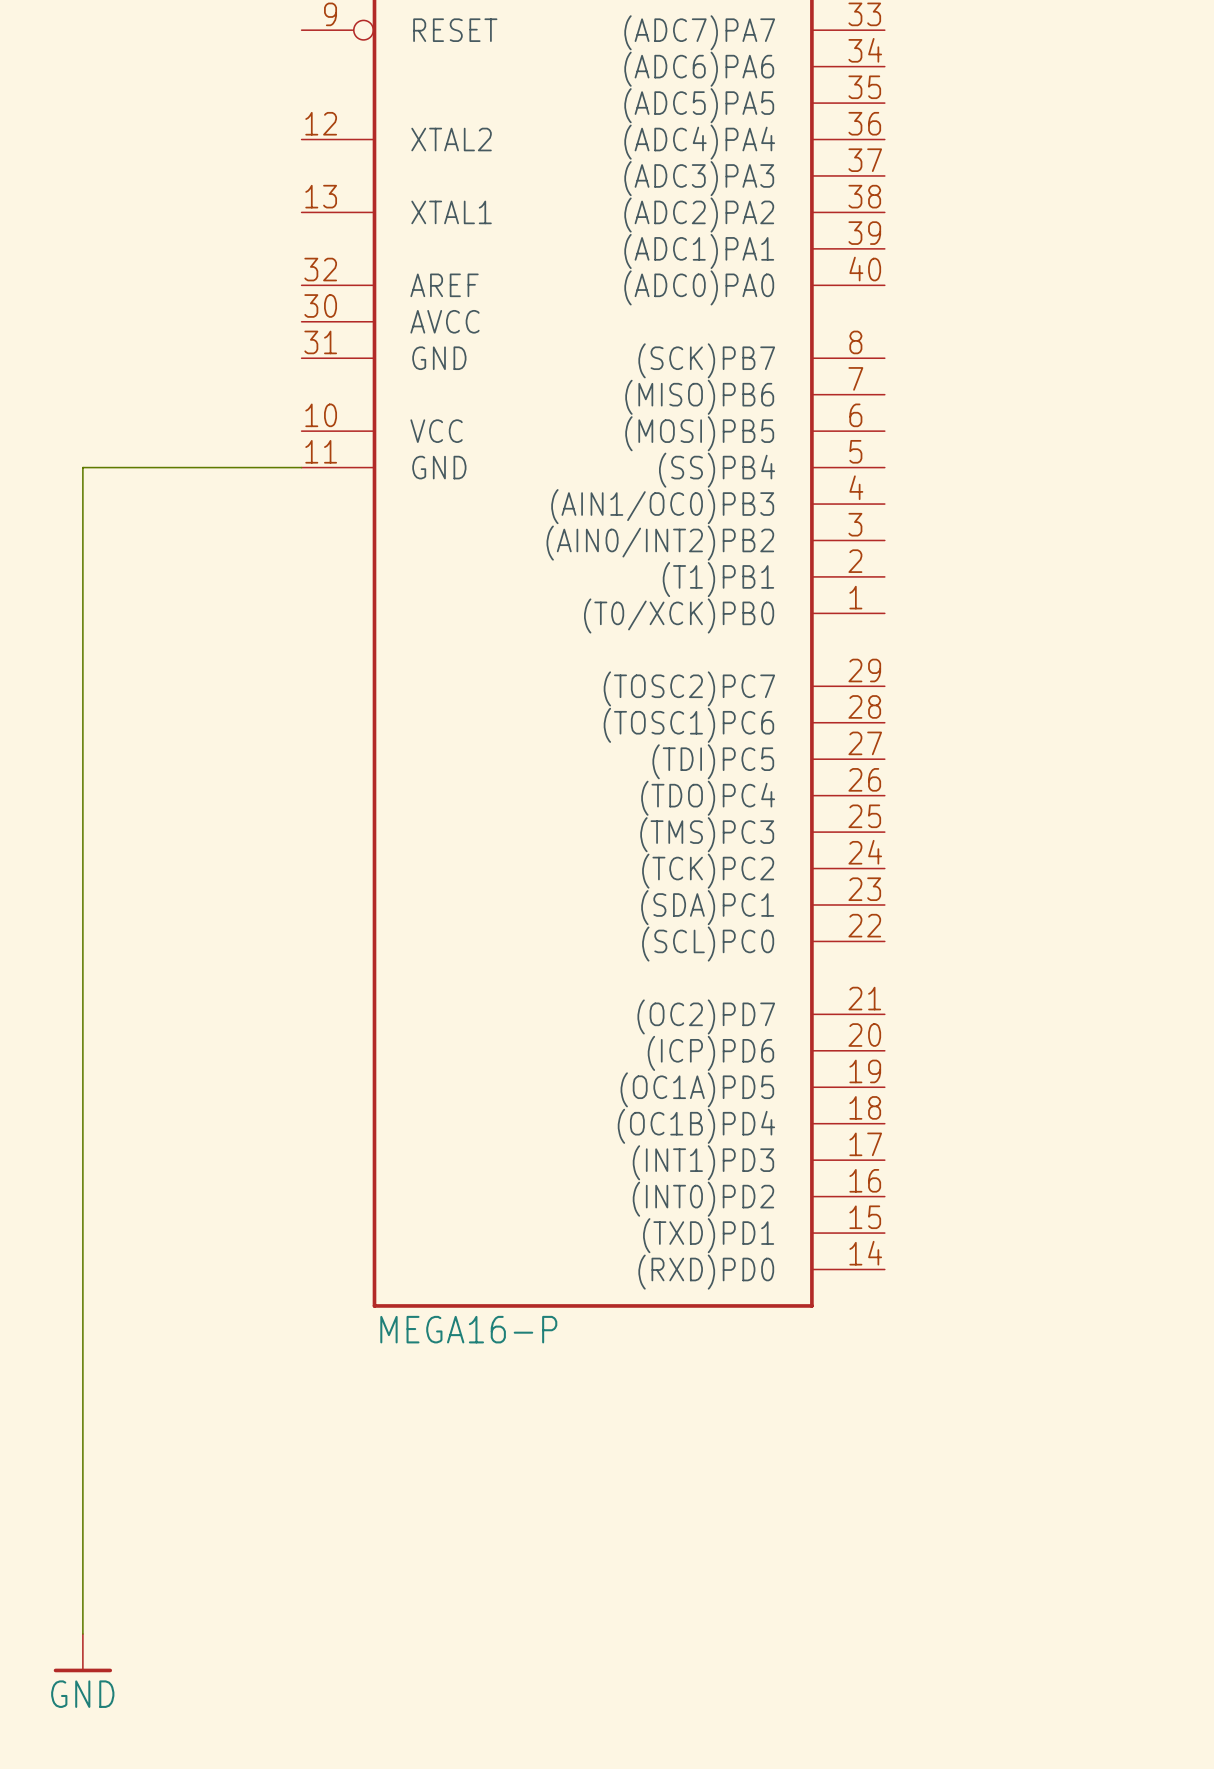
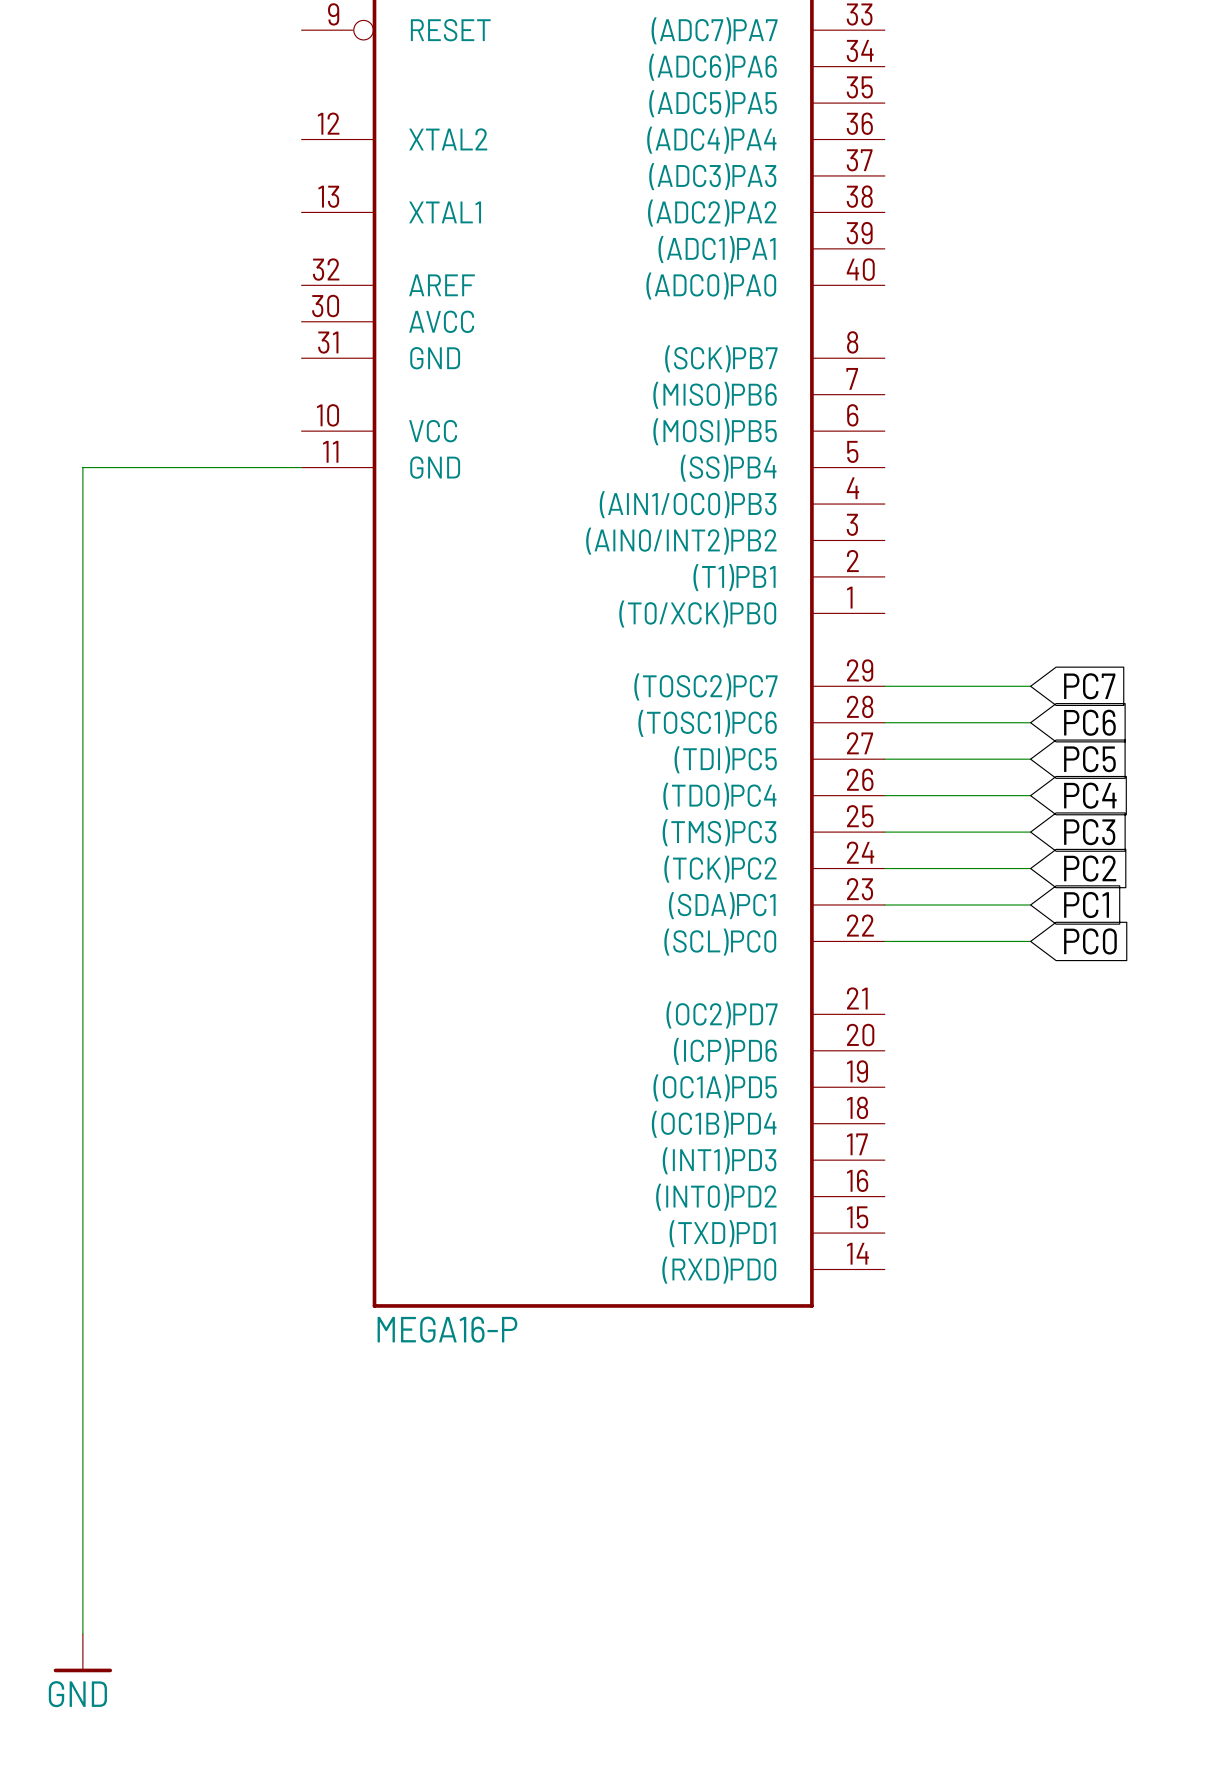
wire: none -> (884, 686) (1030, 686)
global label: none -> PC7 (1089, 686)
wire: none -> (884, 722) (1030, 722)
global label: none -> PC6 (1089, 722)
wire: none -> (884, 759) (1030, 759)
global label: none -> PC5 (1089, 759)
wire: none -> (884, 795) (1030, 795)
global label: none -> PC4 (1090, 795)
wire: none -> (884, 832) (1030, 832)
global label: none -> PC3 (1089, 832)
wire: none -> (884, 868) (1030, 868)
global label: none -> PC2 (1090, 868)
wire: none -> (884, 904) (1030, 904)
global label: none -> PC1 (1086, 905)
wire: none -> (884, 941) (1030, 941)
global label: none -> PC0 (1090, 941)

